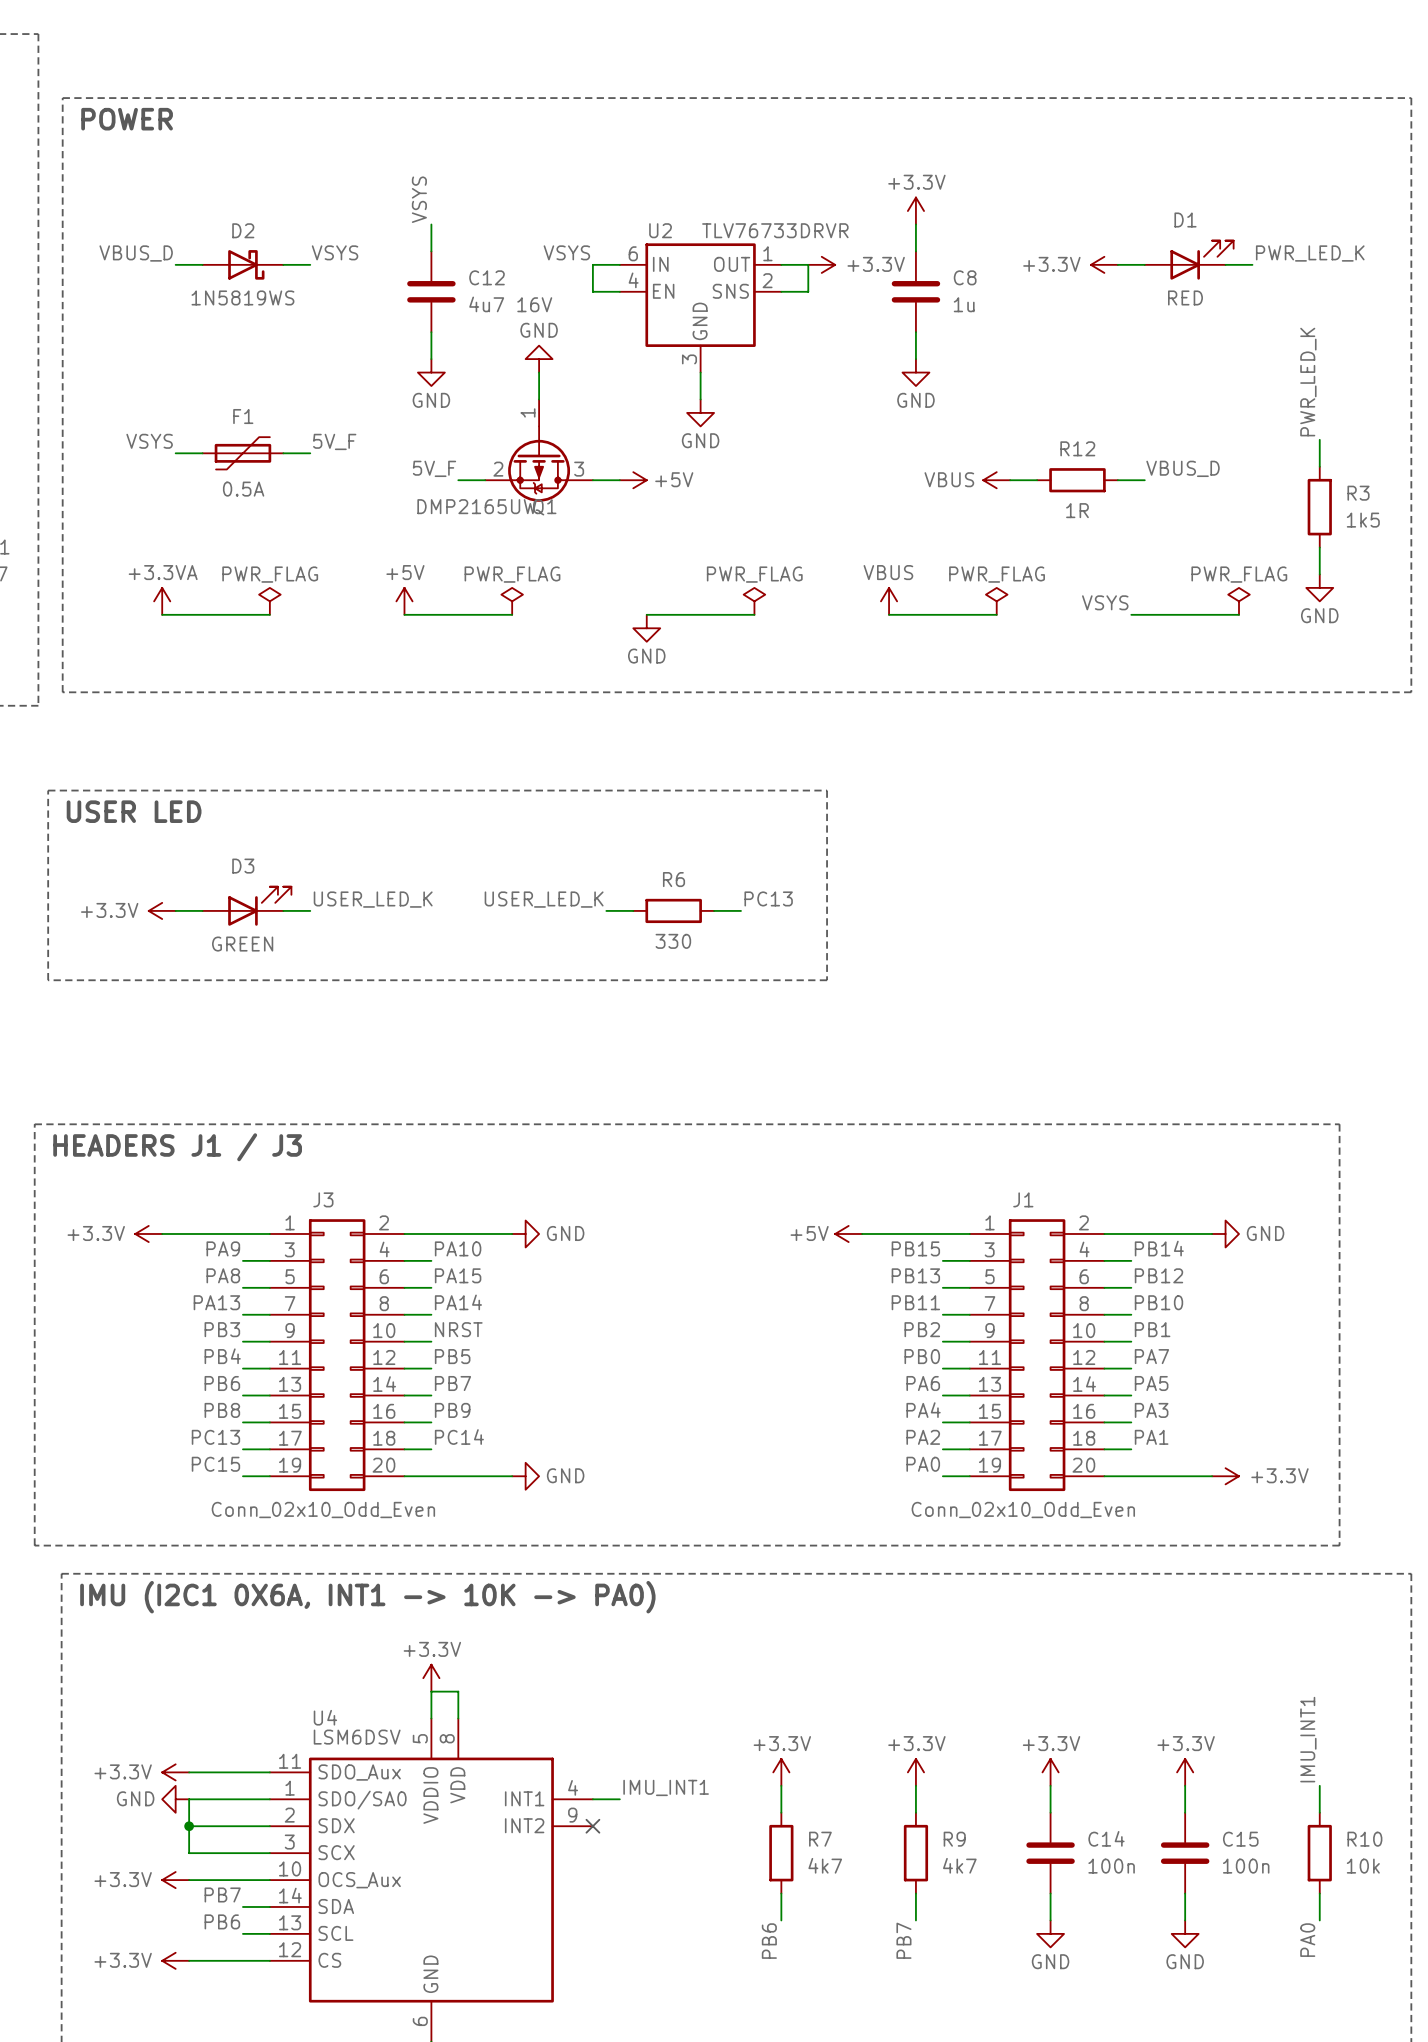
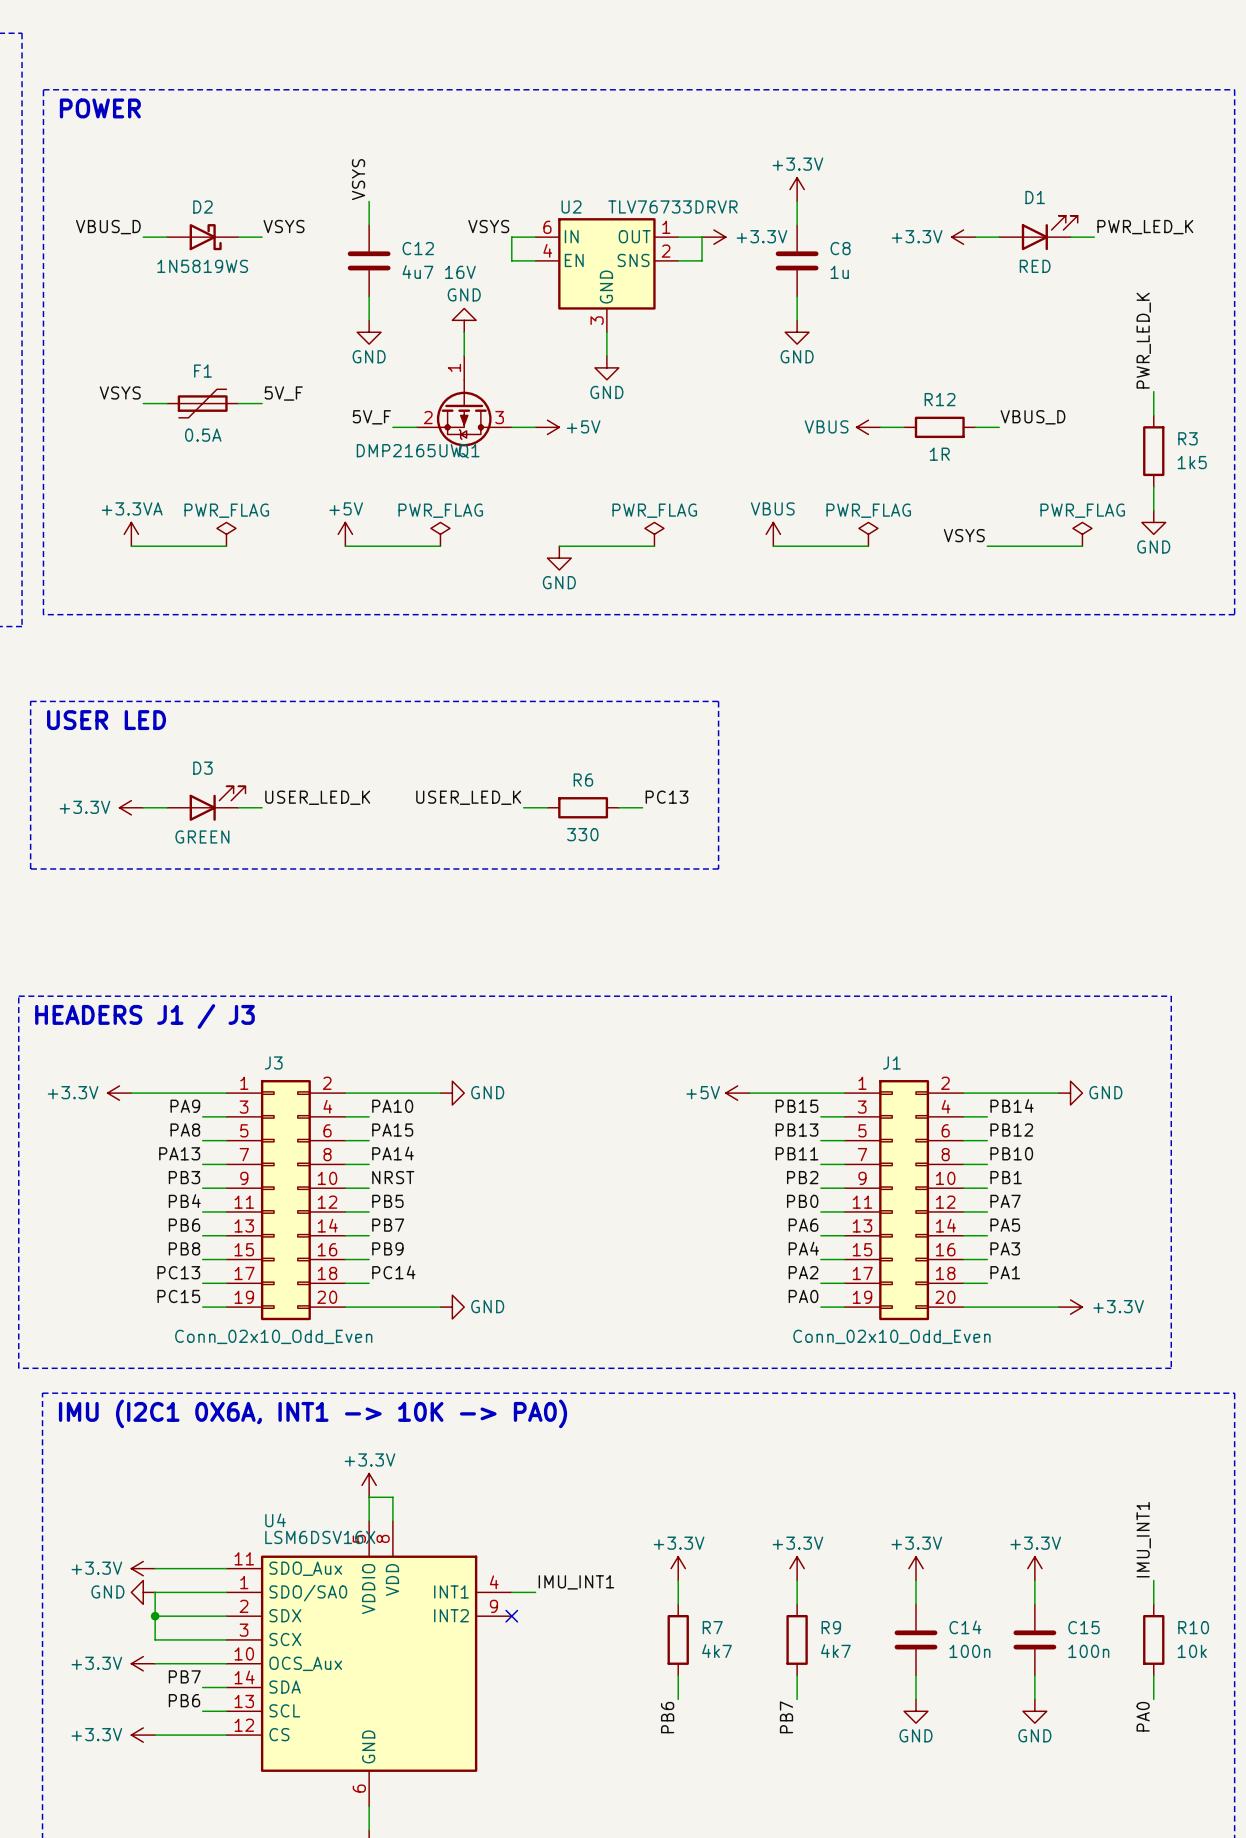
U4 value: LSM6DSV (357, 1737) -> LSM6DSV16X (320, 1537)

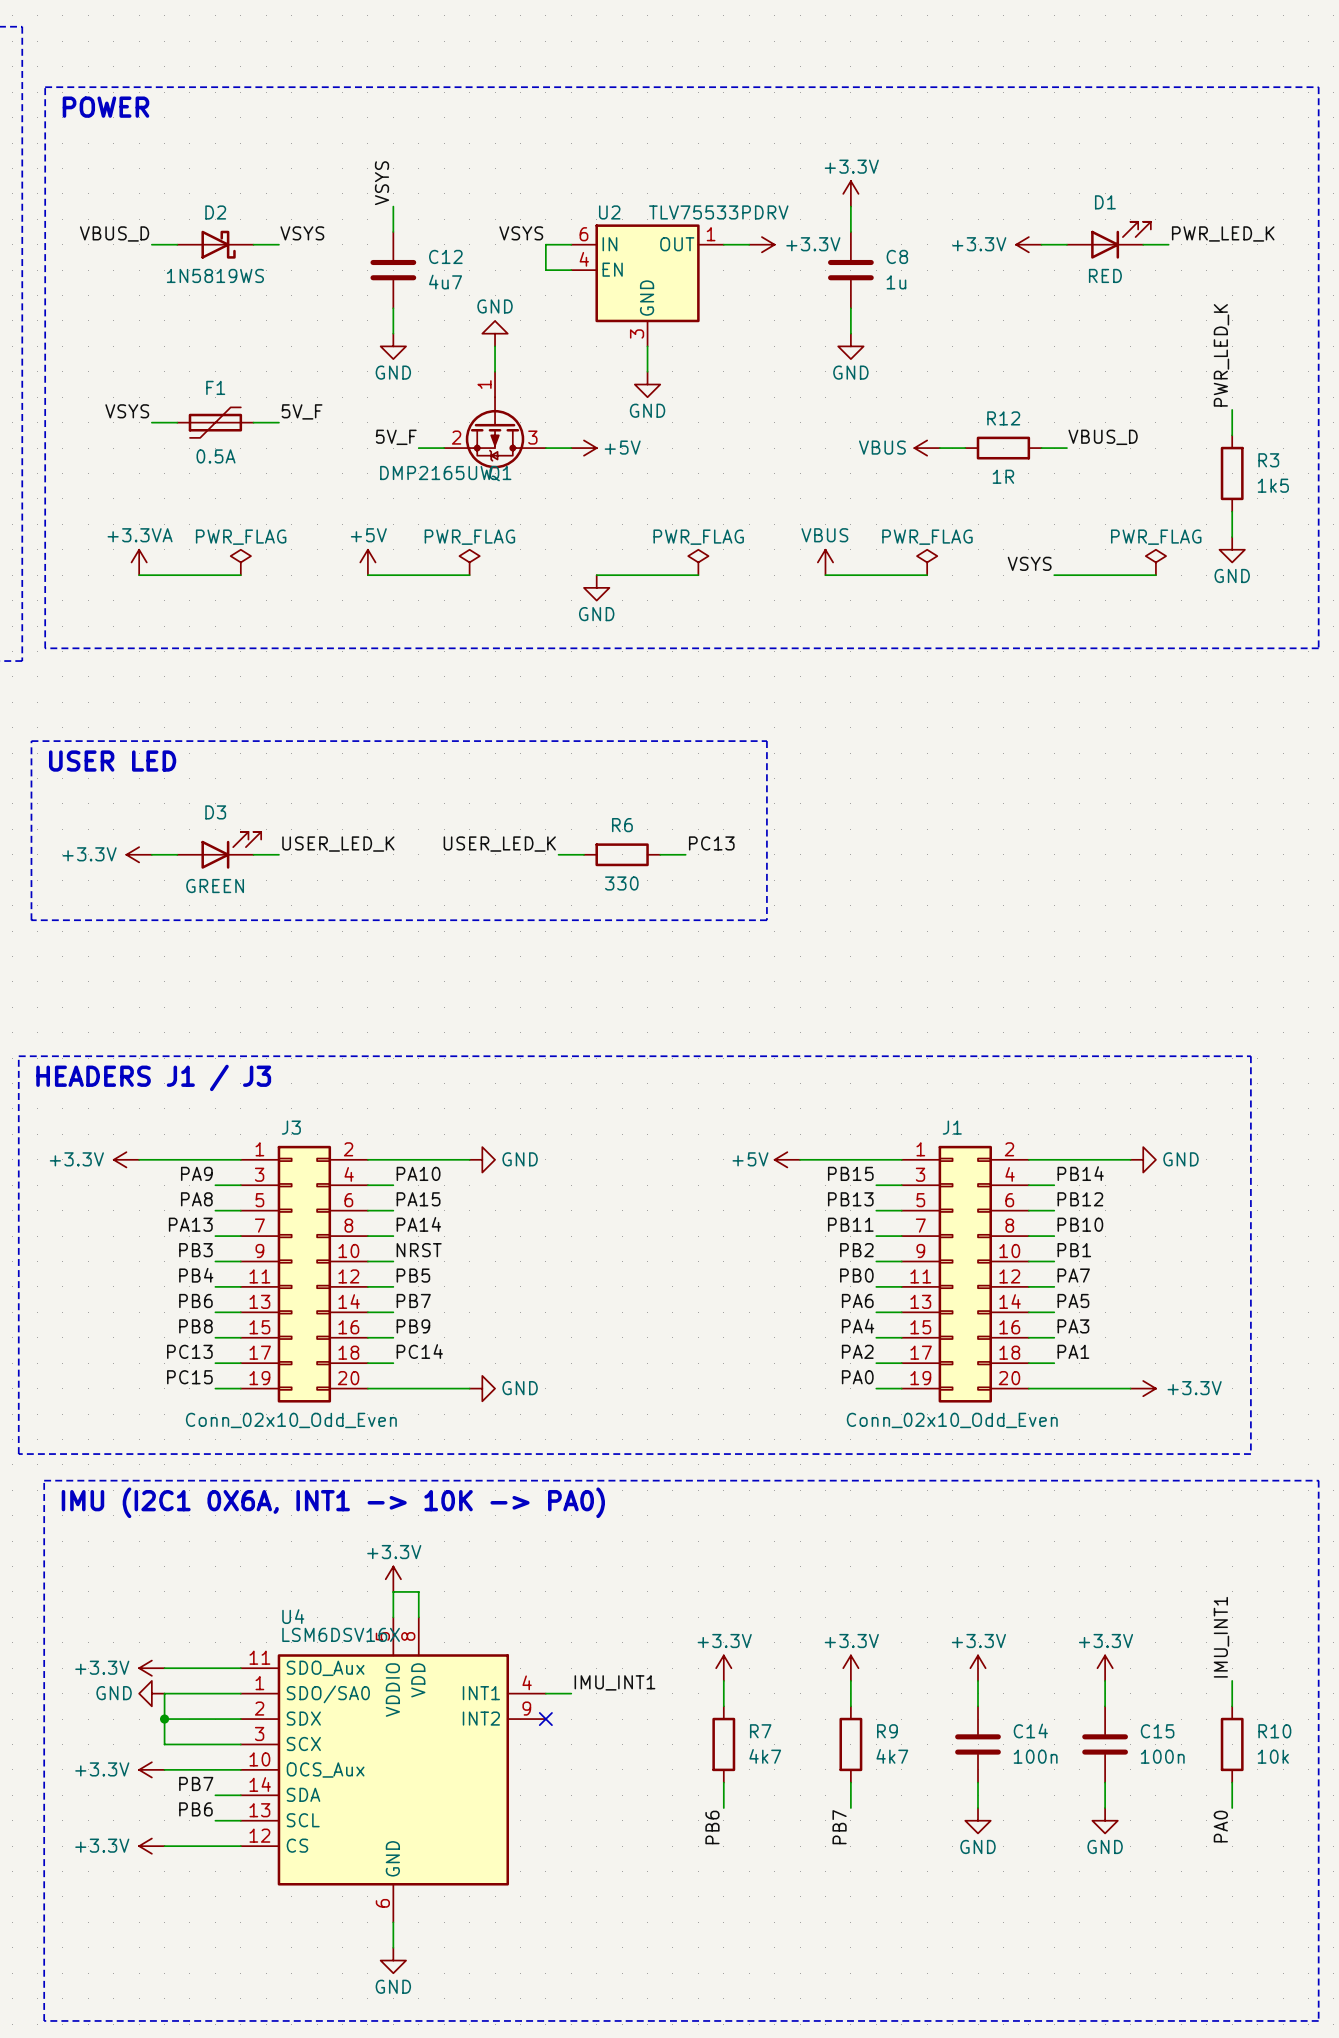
U2 value: TLV76733DRVR (672, 206) -> TLV75533PDRV (718, 212)
U2 symbol: [535, 218, 679, 333] -> [571, 224, 724, 347]
wire: (702, 237) (702, 260) (678, 260) -> none
C12 value: 4u7 16V (439, 272) -> 4u7 (445, 282)

